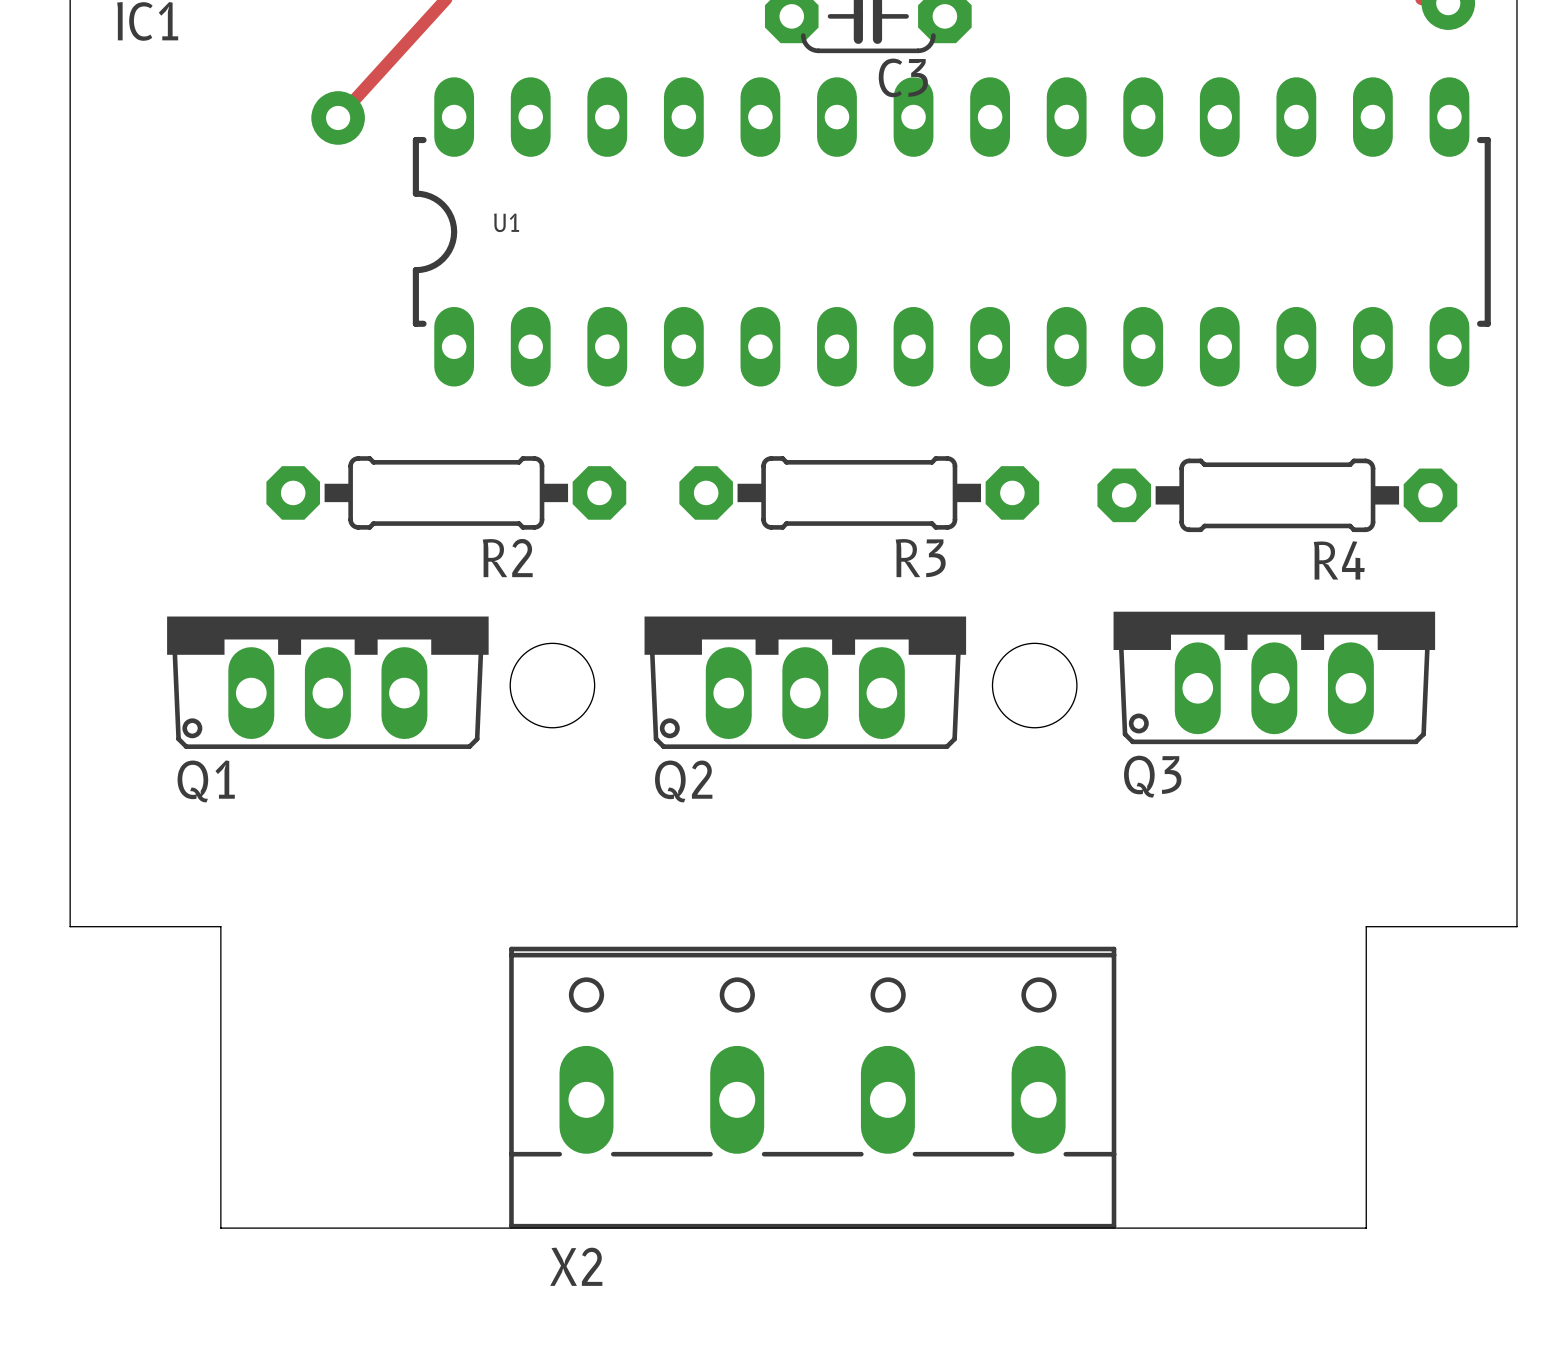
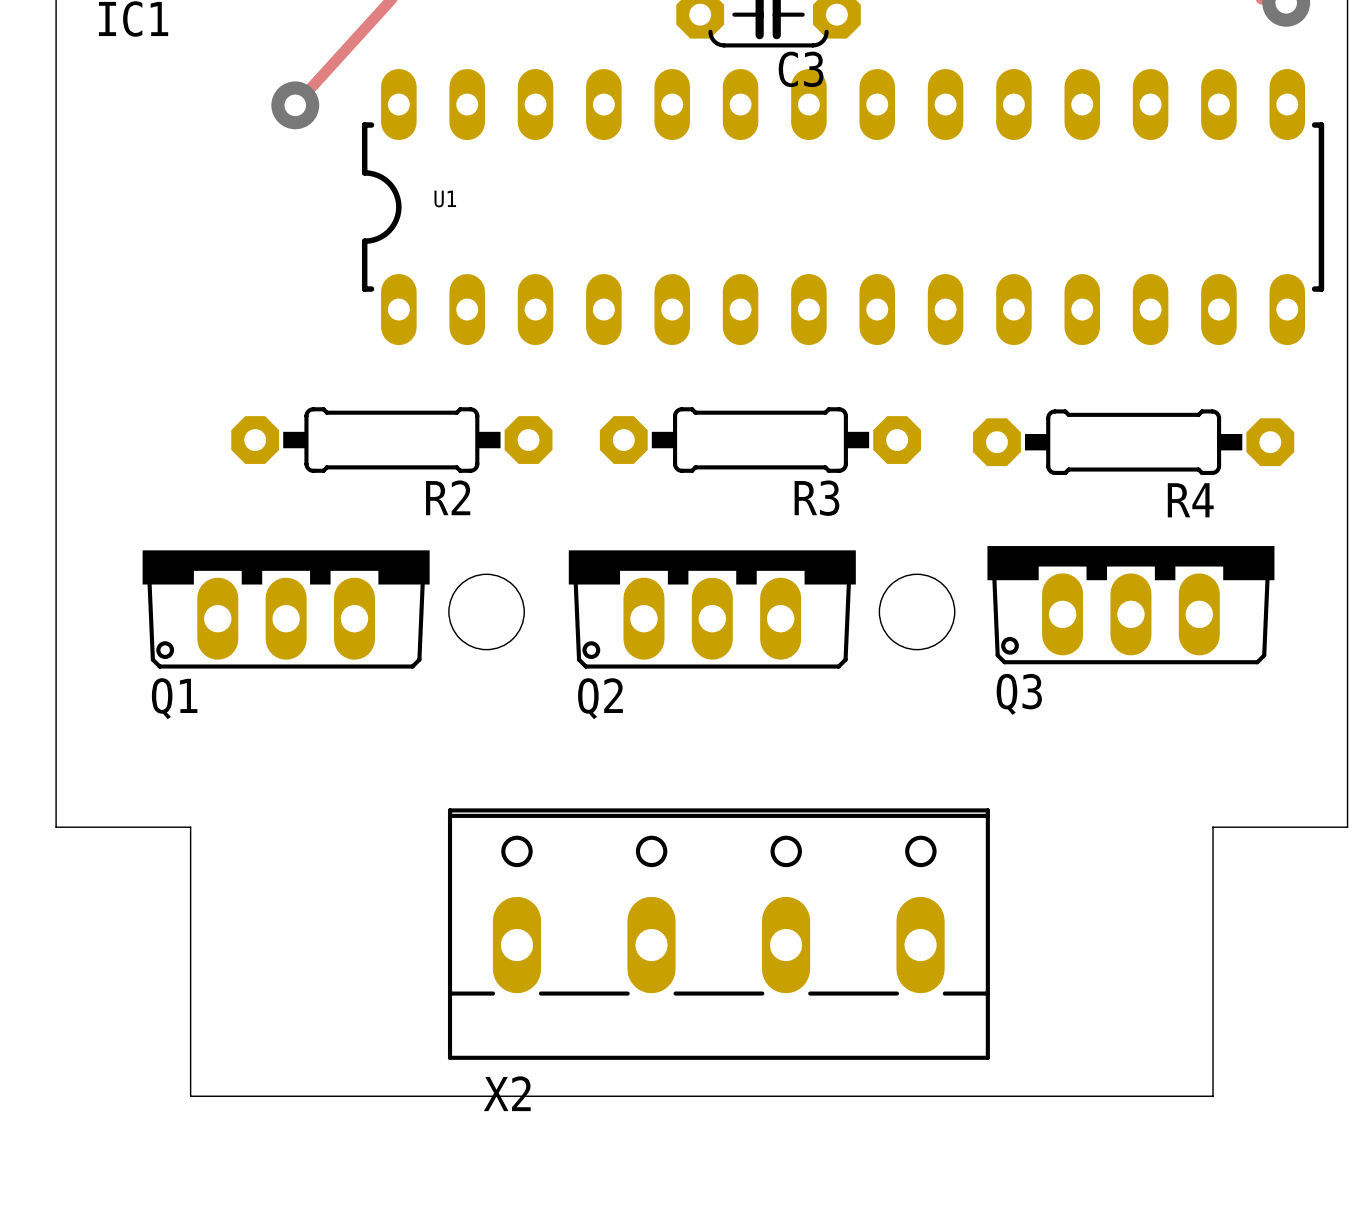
X2 position: (812, 1087) -> (718, 934)

